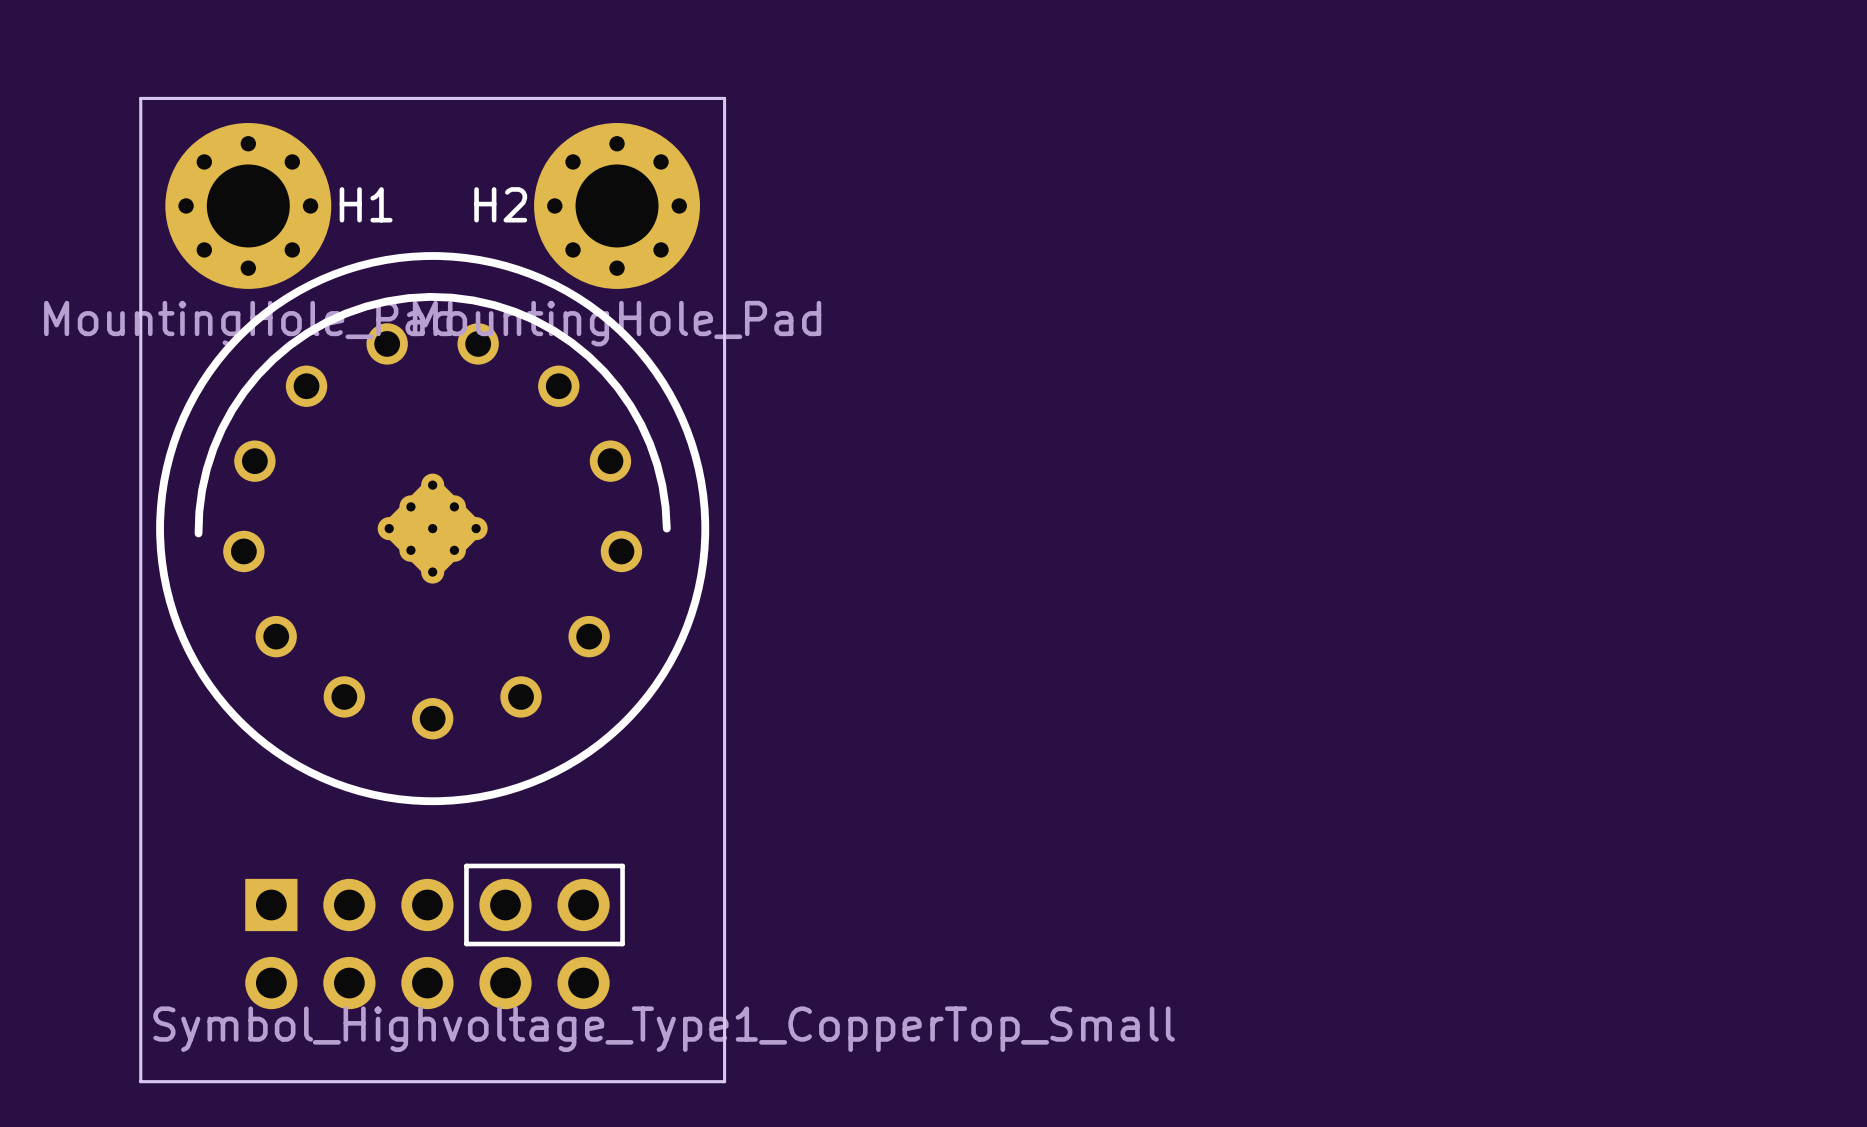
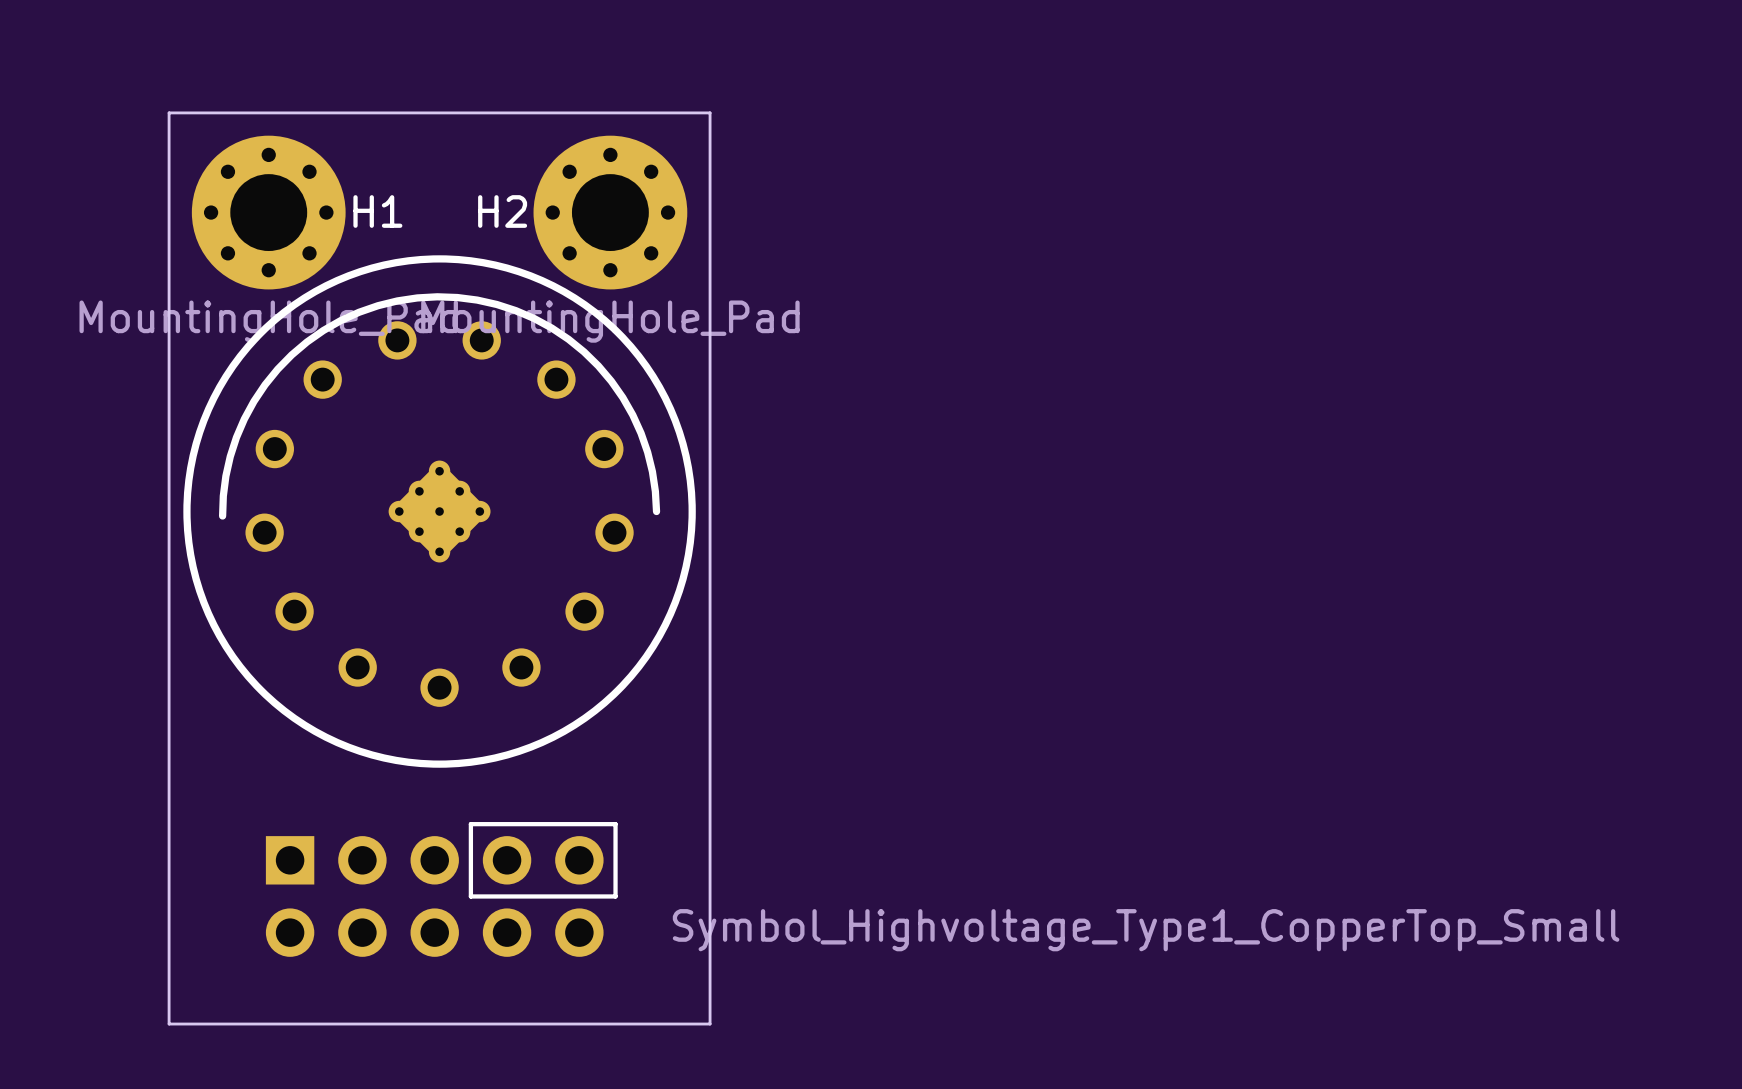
drawing position: (664, 1029) -> (1146, 930)

